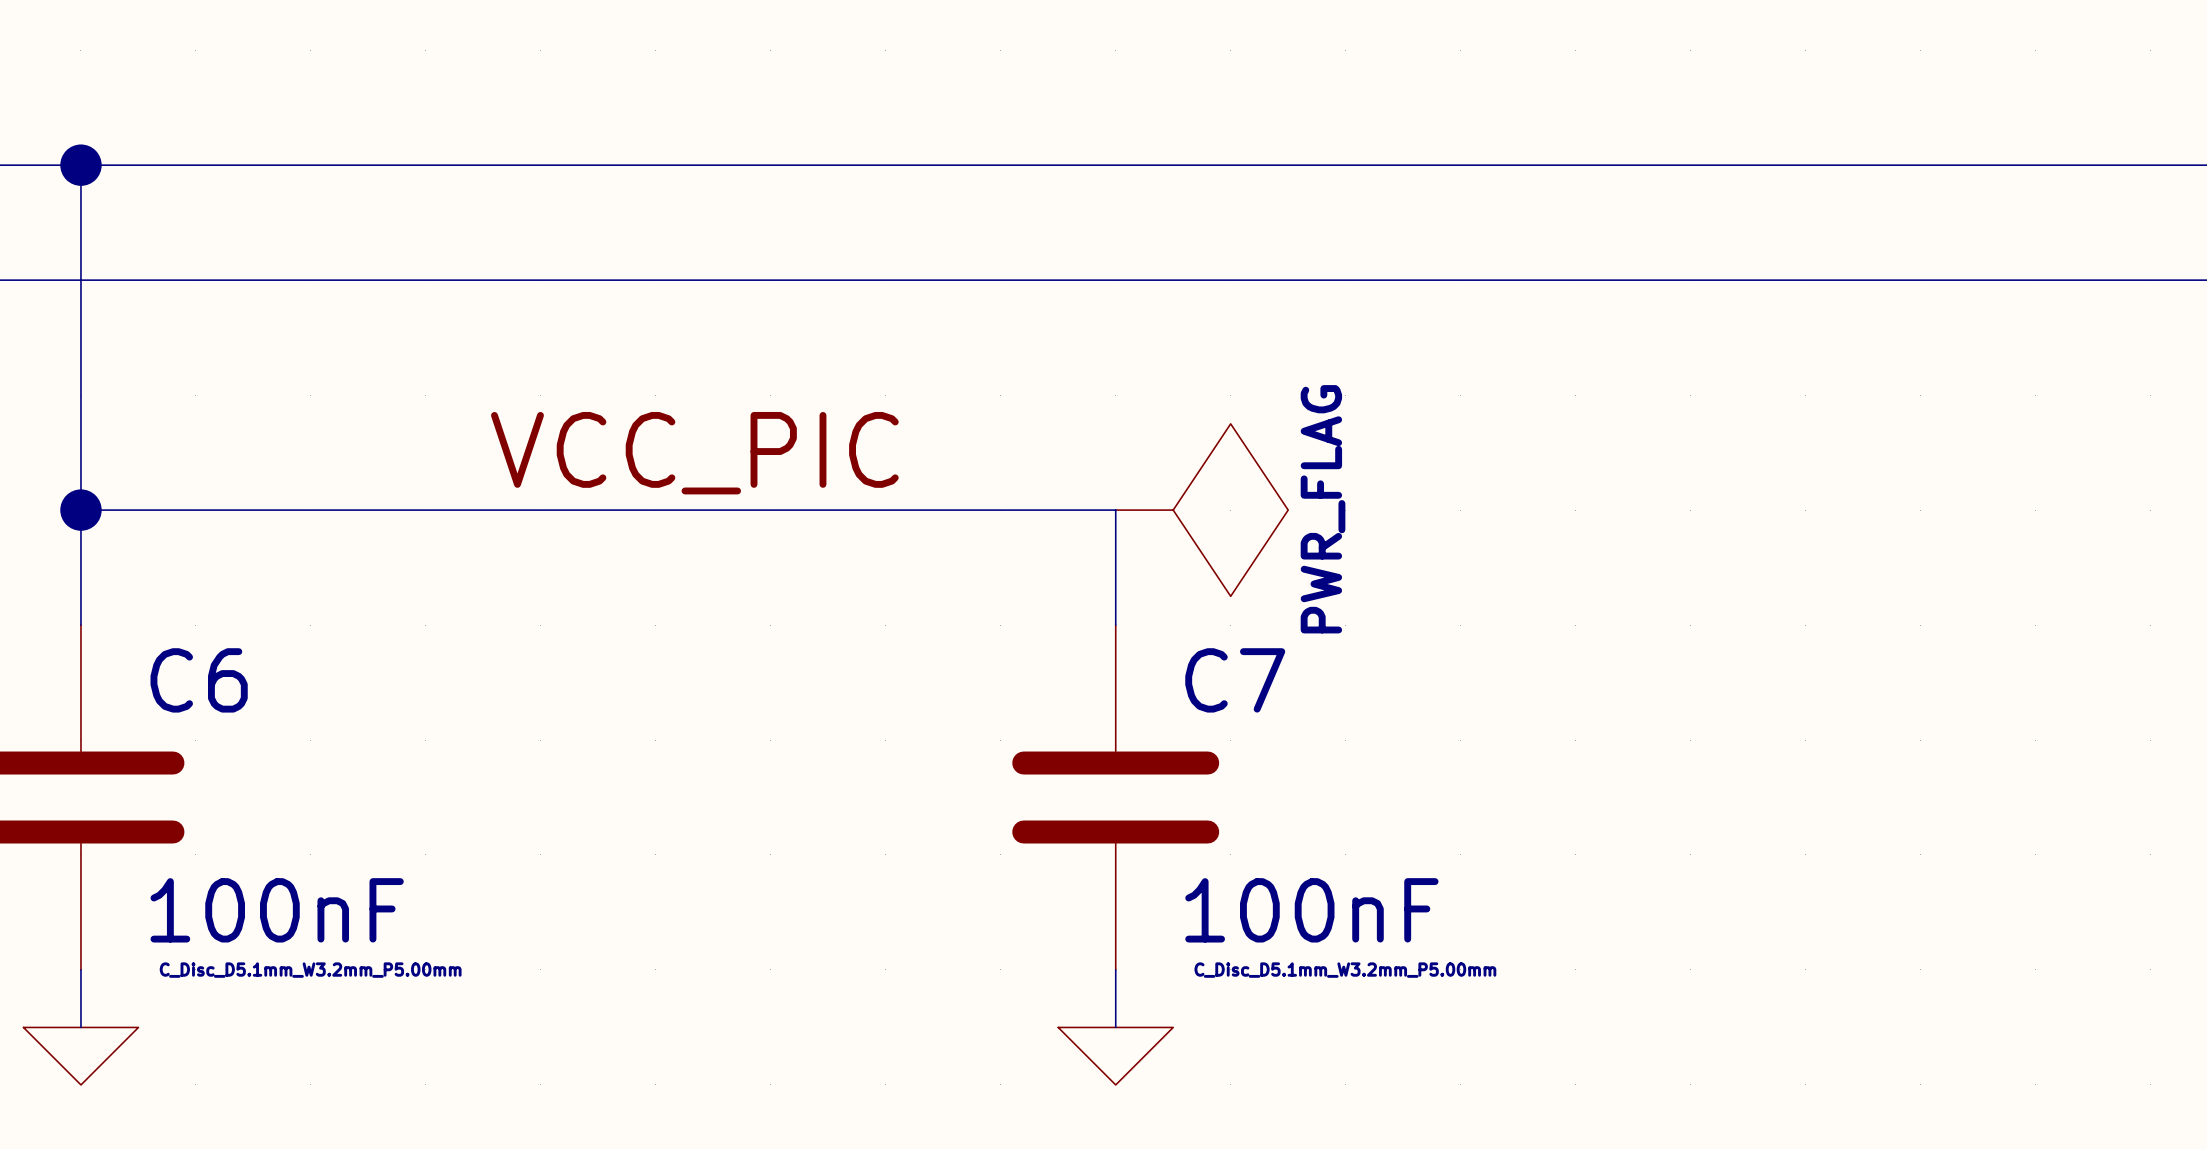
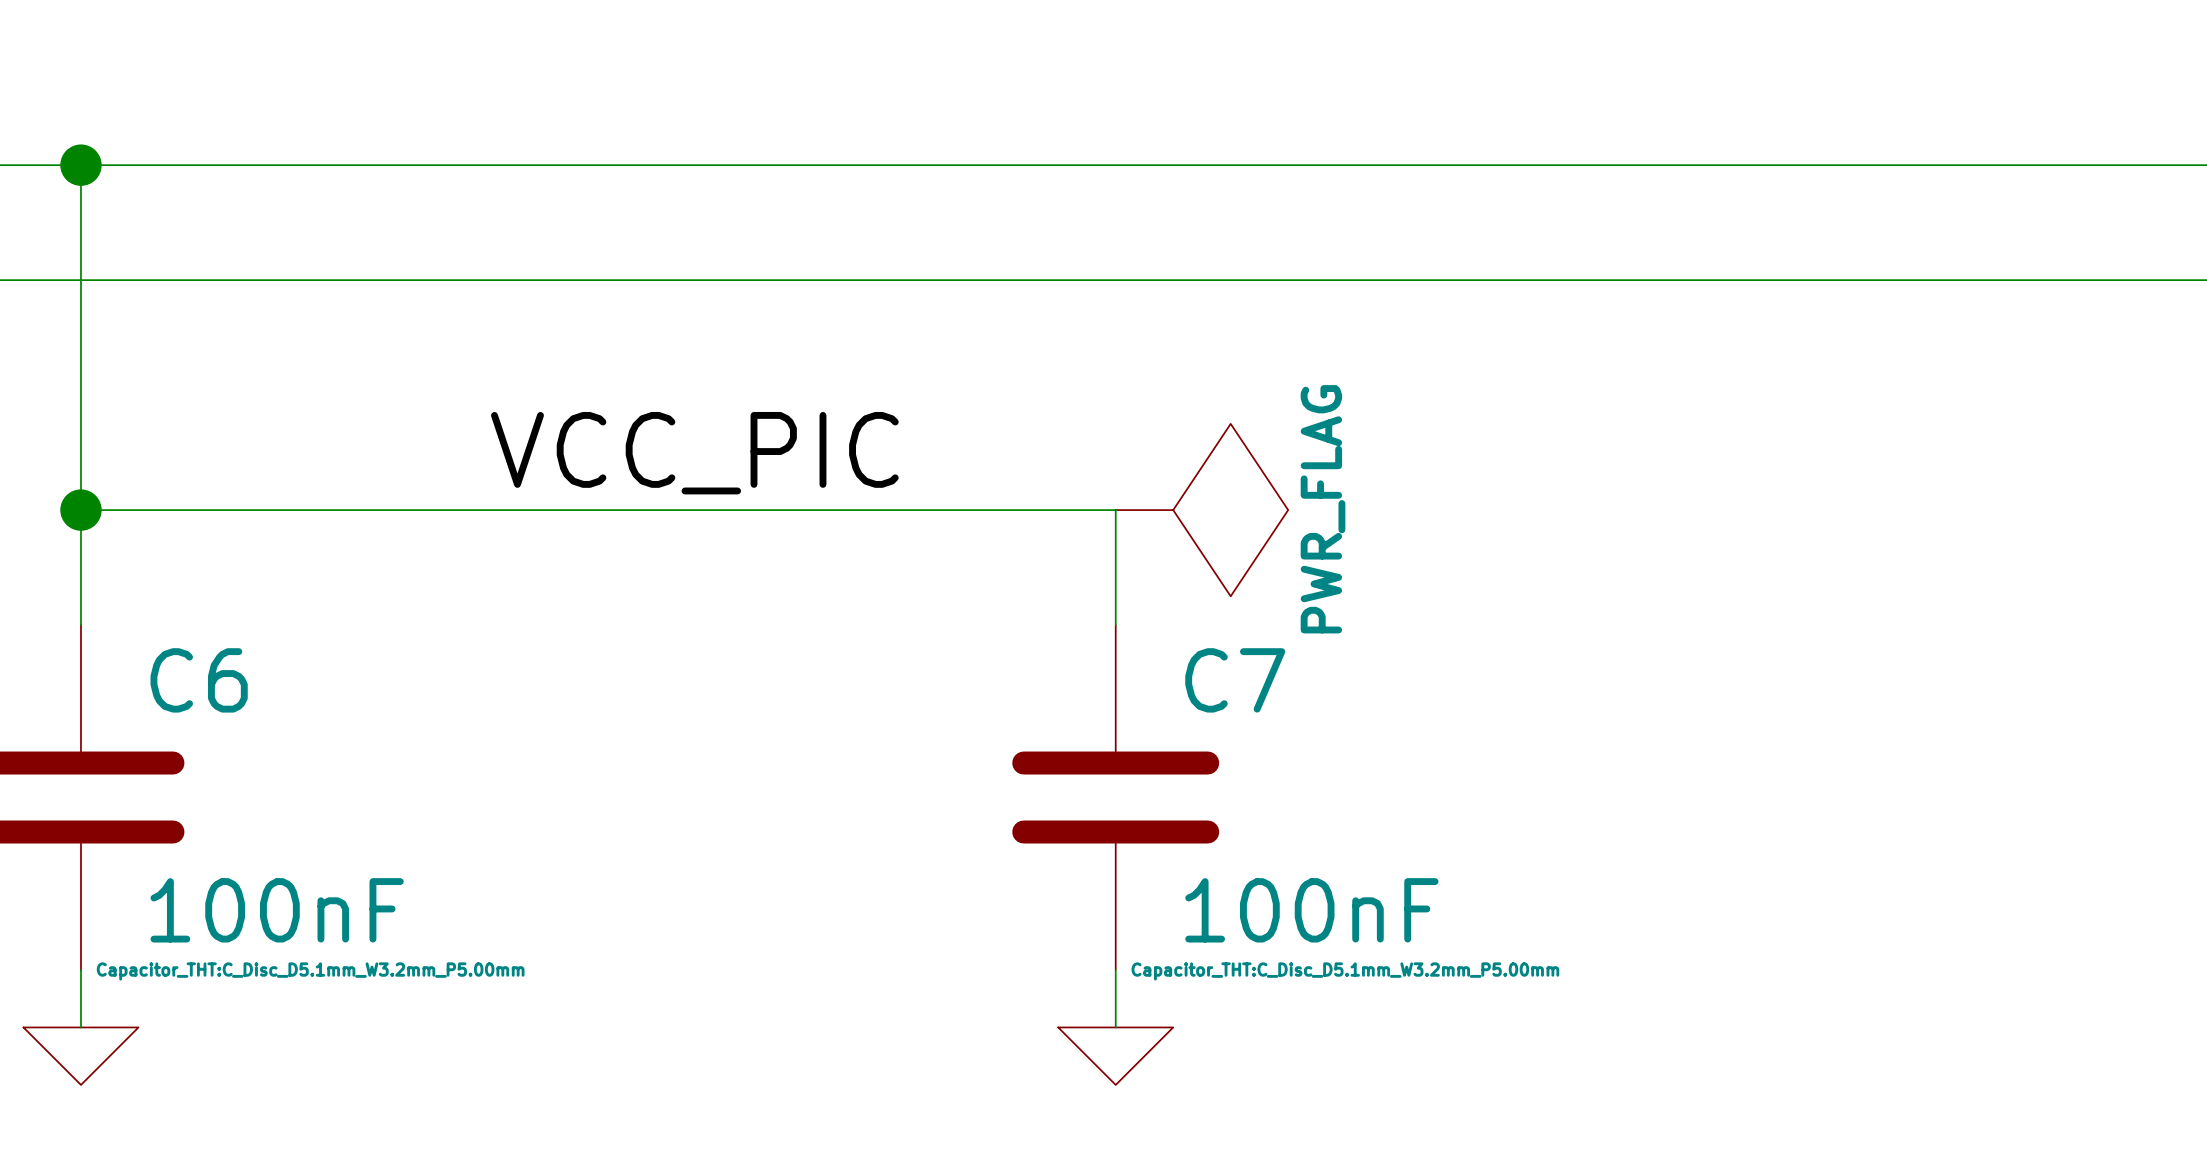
C6 text: C_Disc_D5.1mm_W3.2mm_P5.00mm (310, 970) -> Capacitor_THT:C_Disc_D5.1mm_W3.2mm_P5.00mm (310, 971)
C7 text: C_Disc_D5.1mm_W3.2mm_P5.00mm (1345, 970) -> Capacitor_THT:C_Disc_D5.1mm_W3.2mm_P5.00mm (1345, 971)

